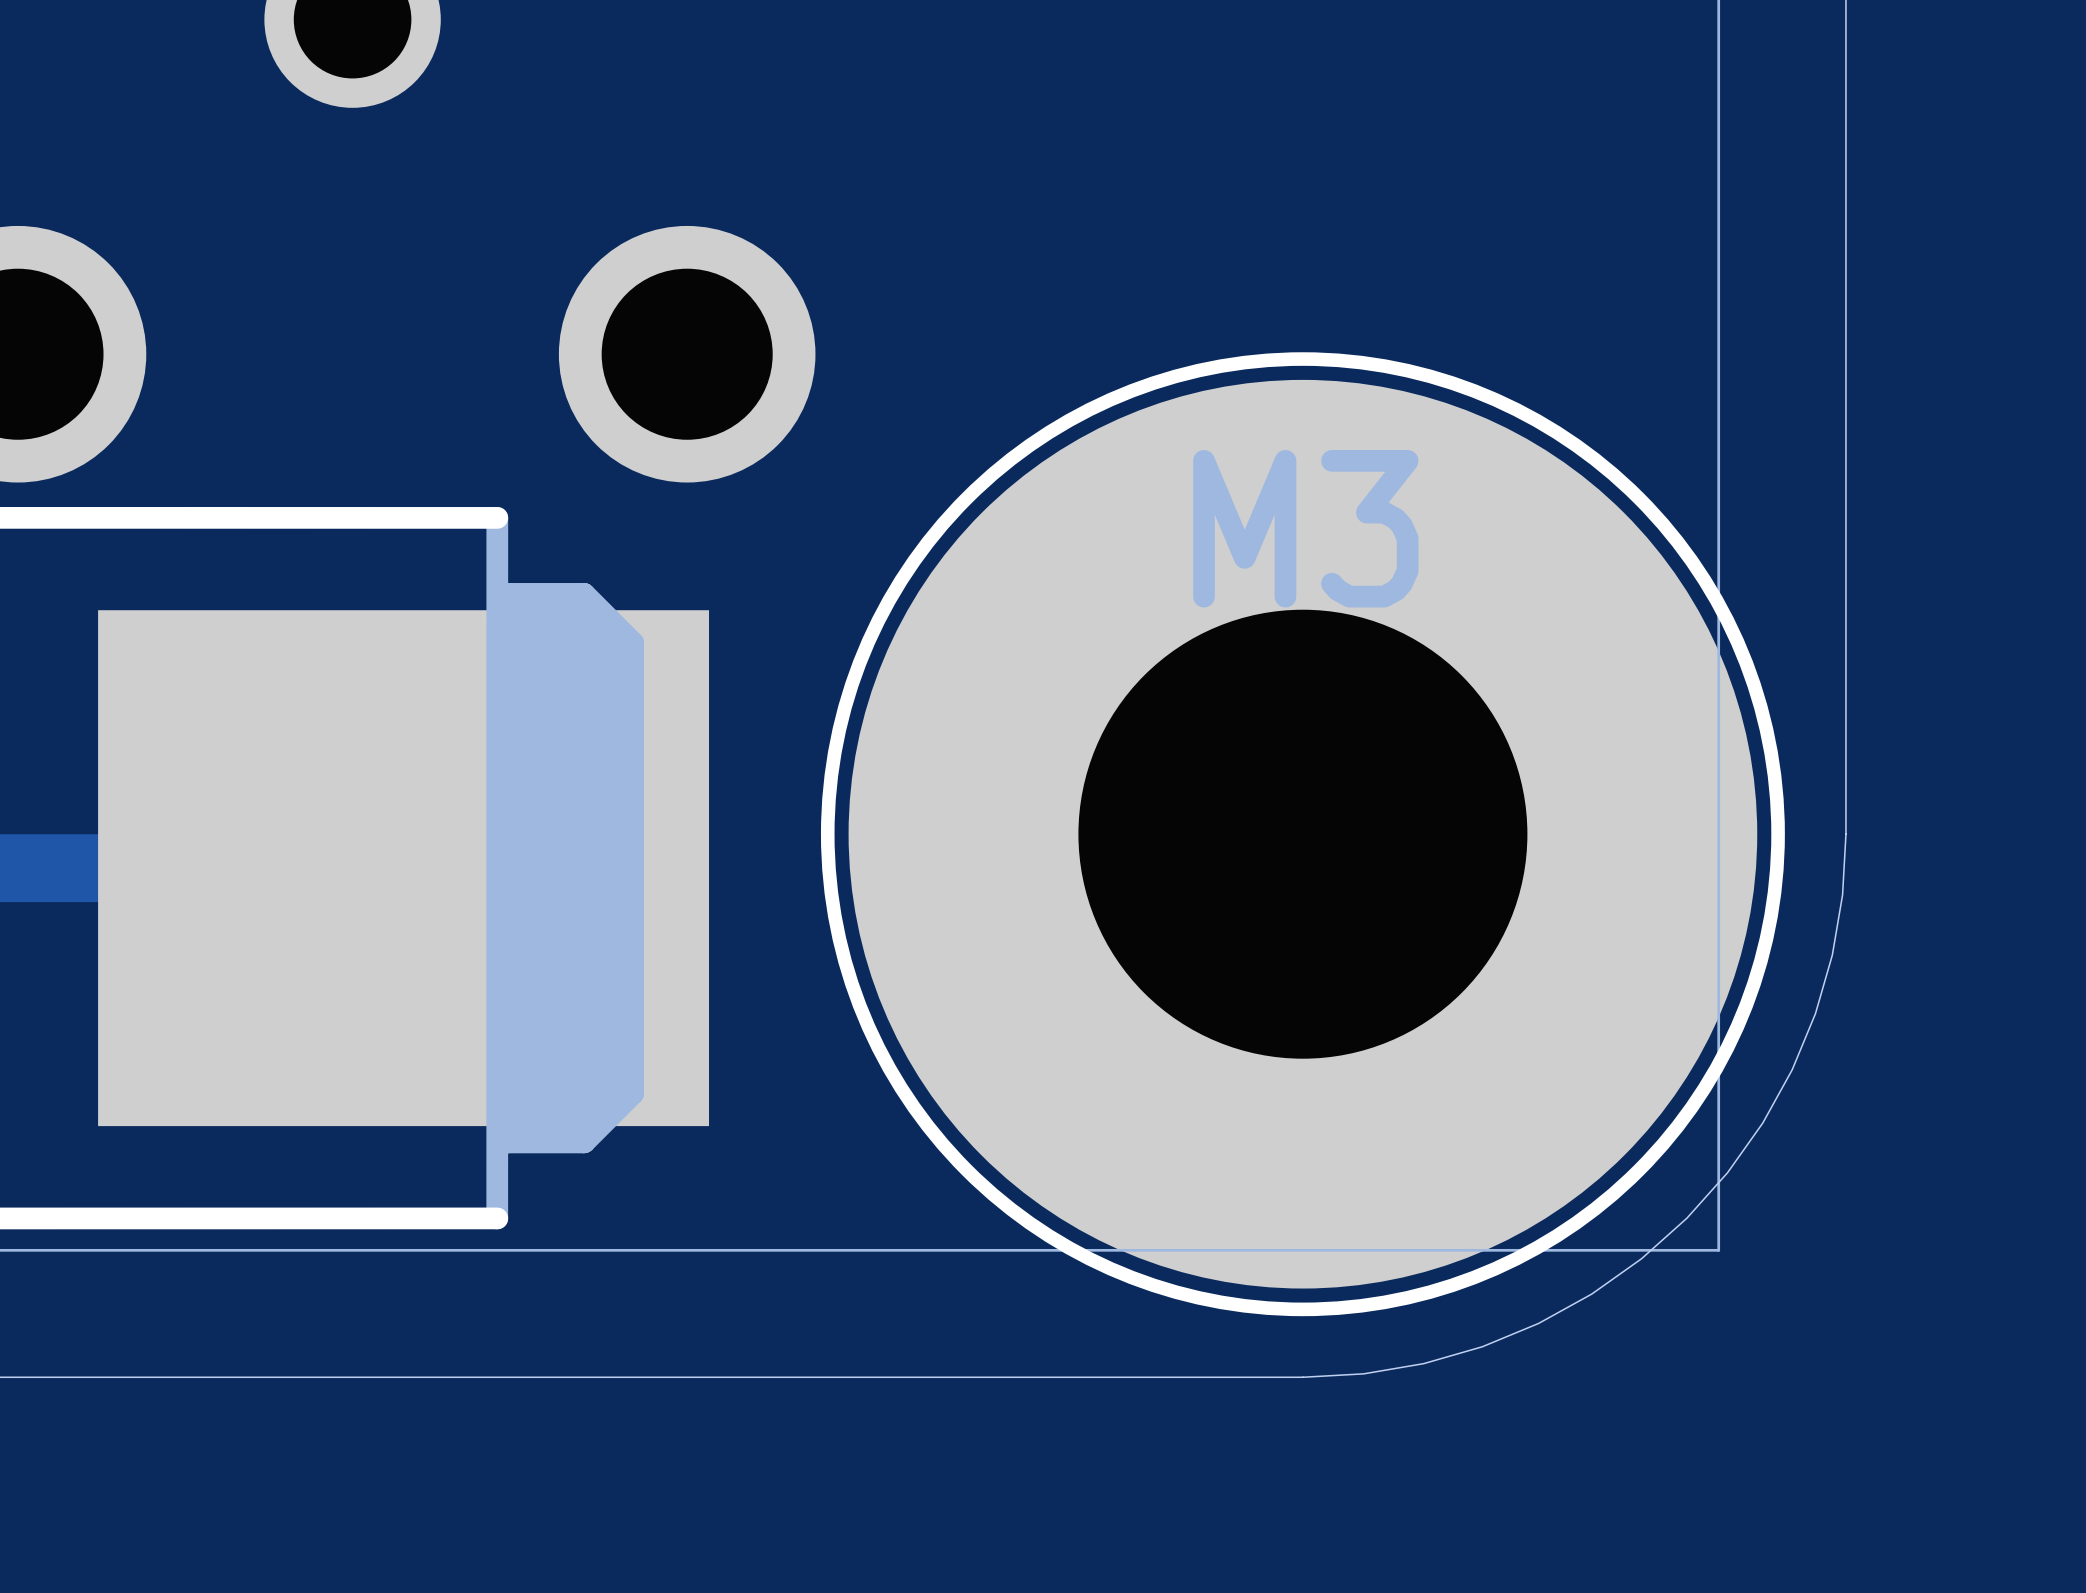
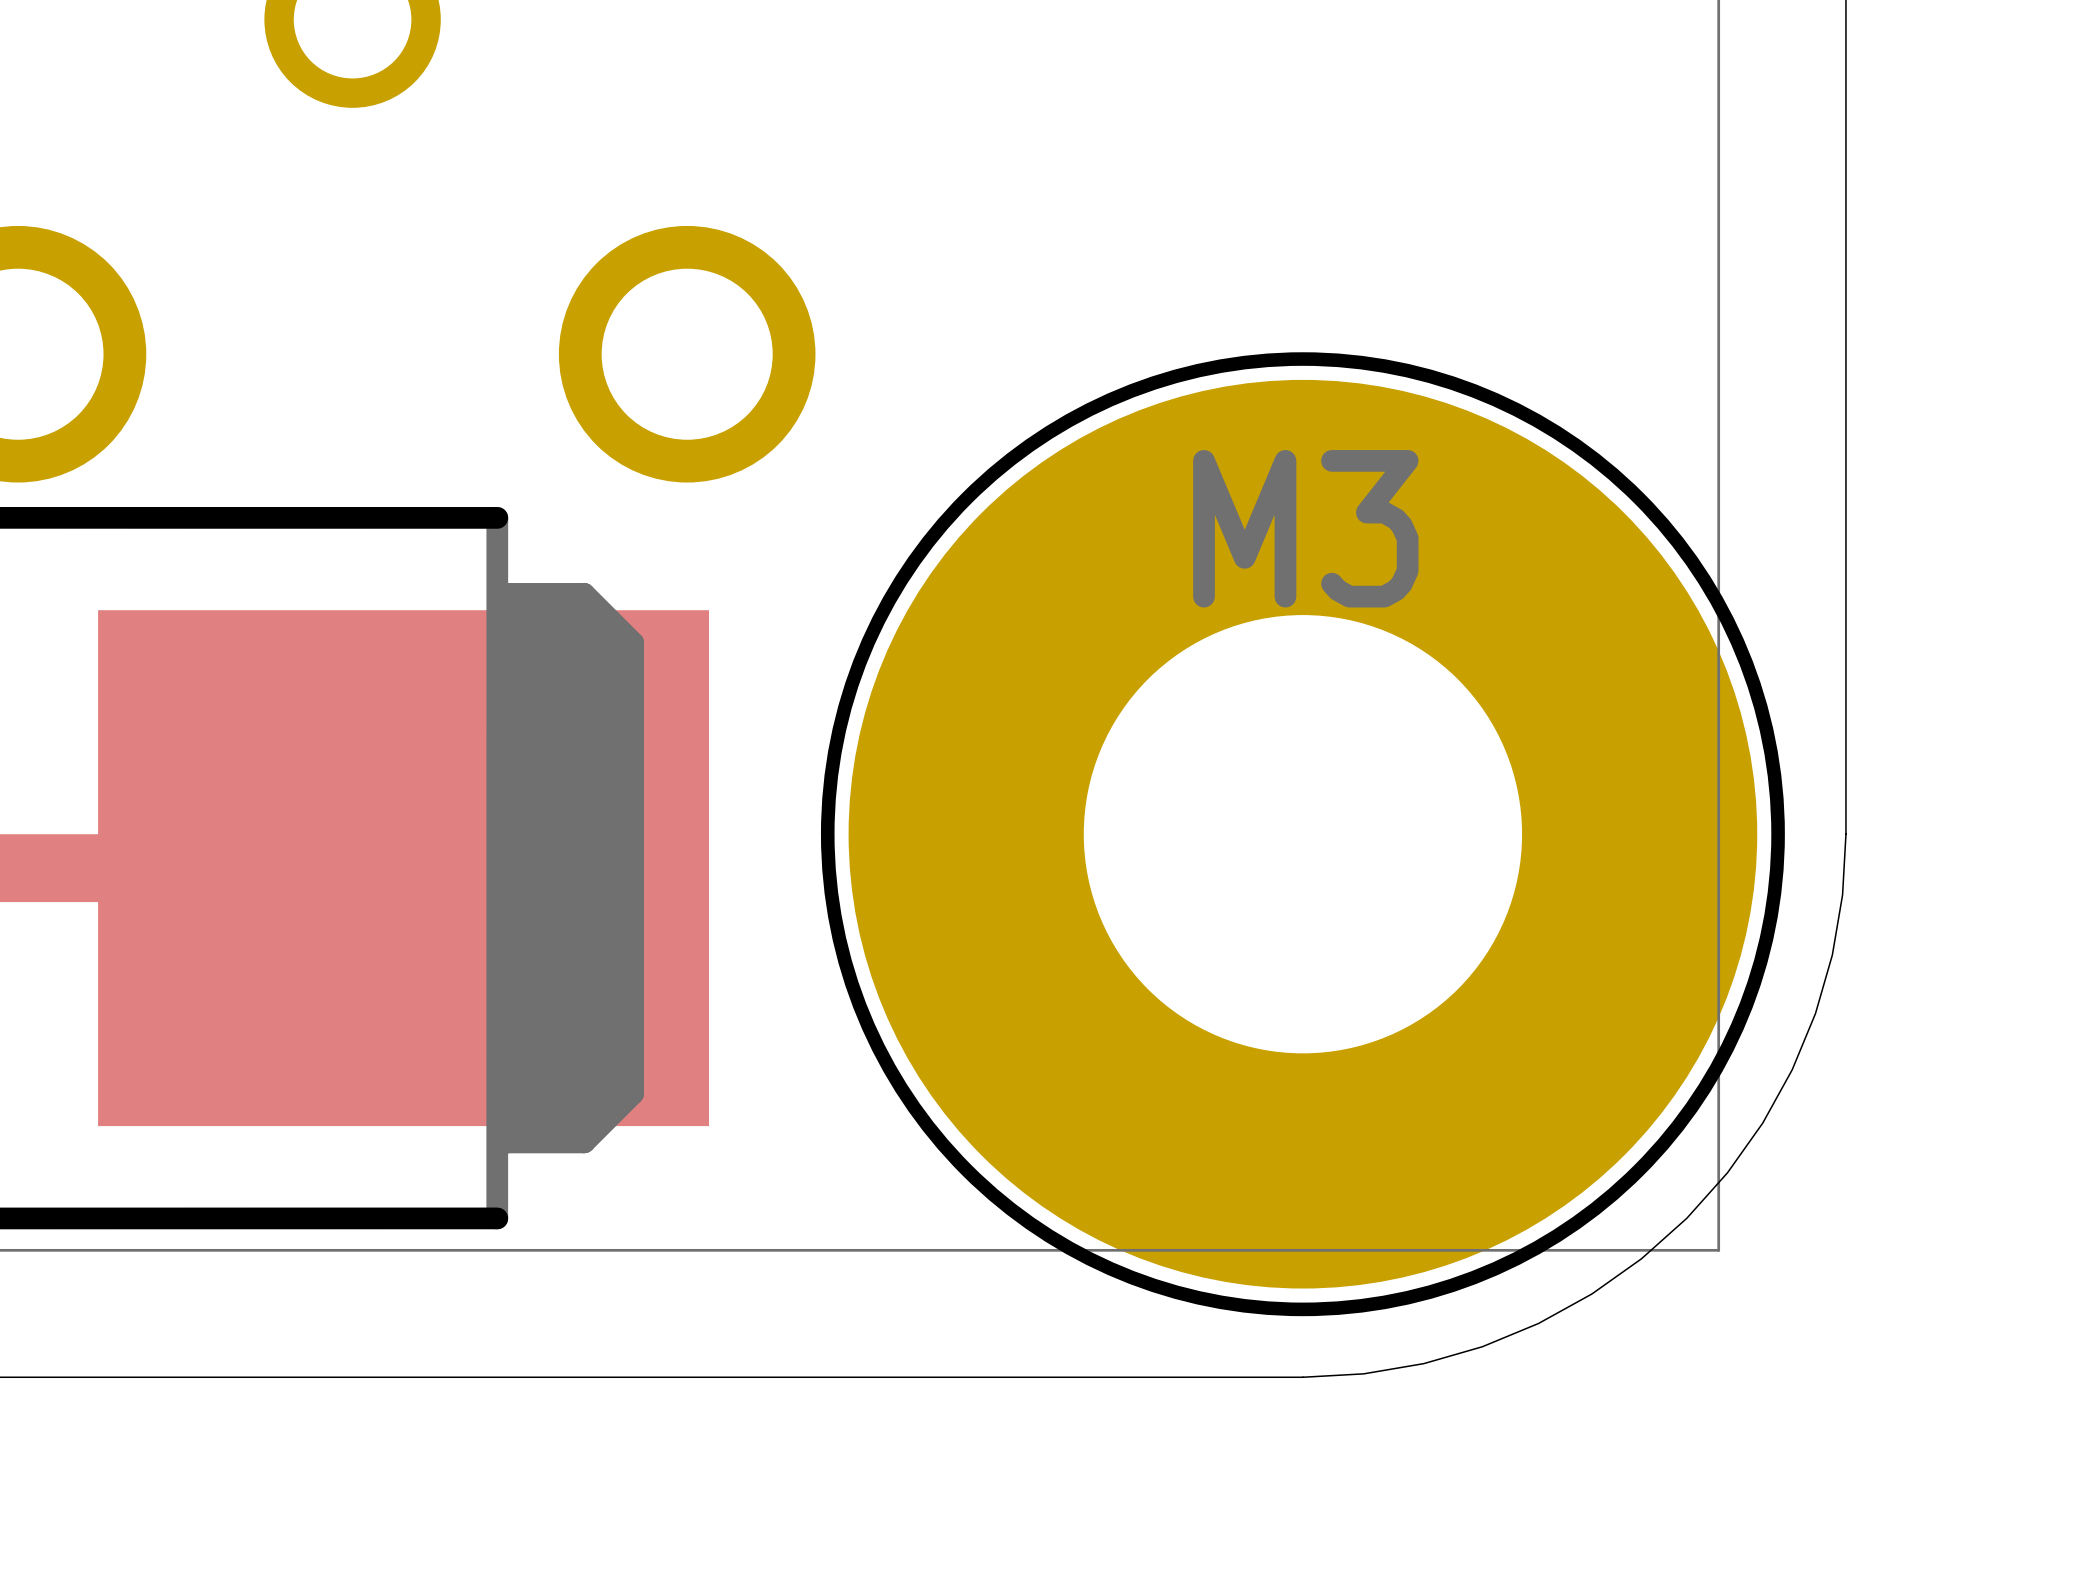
part footprint: [820, 352, 1785, 1317] -> [820, 352, 1785, 1317]

